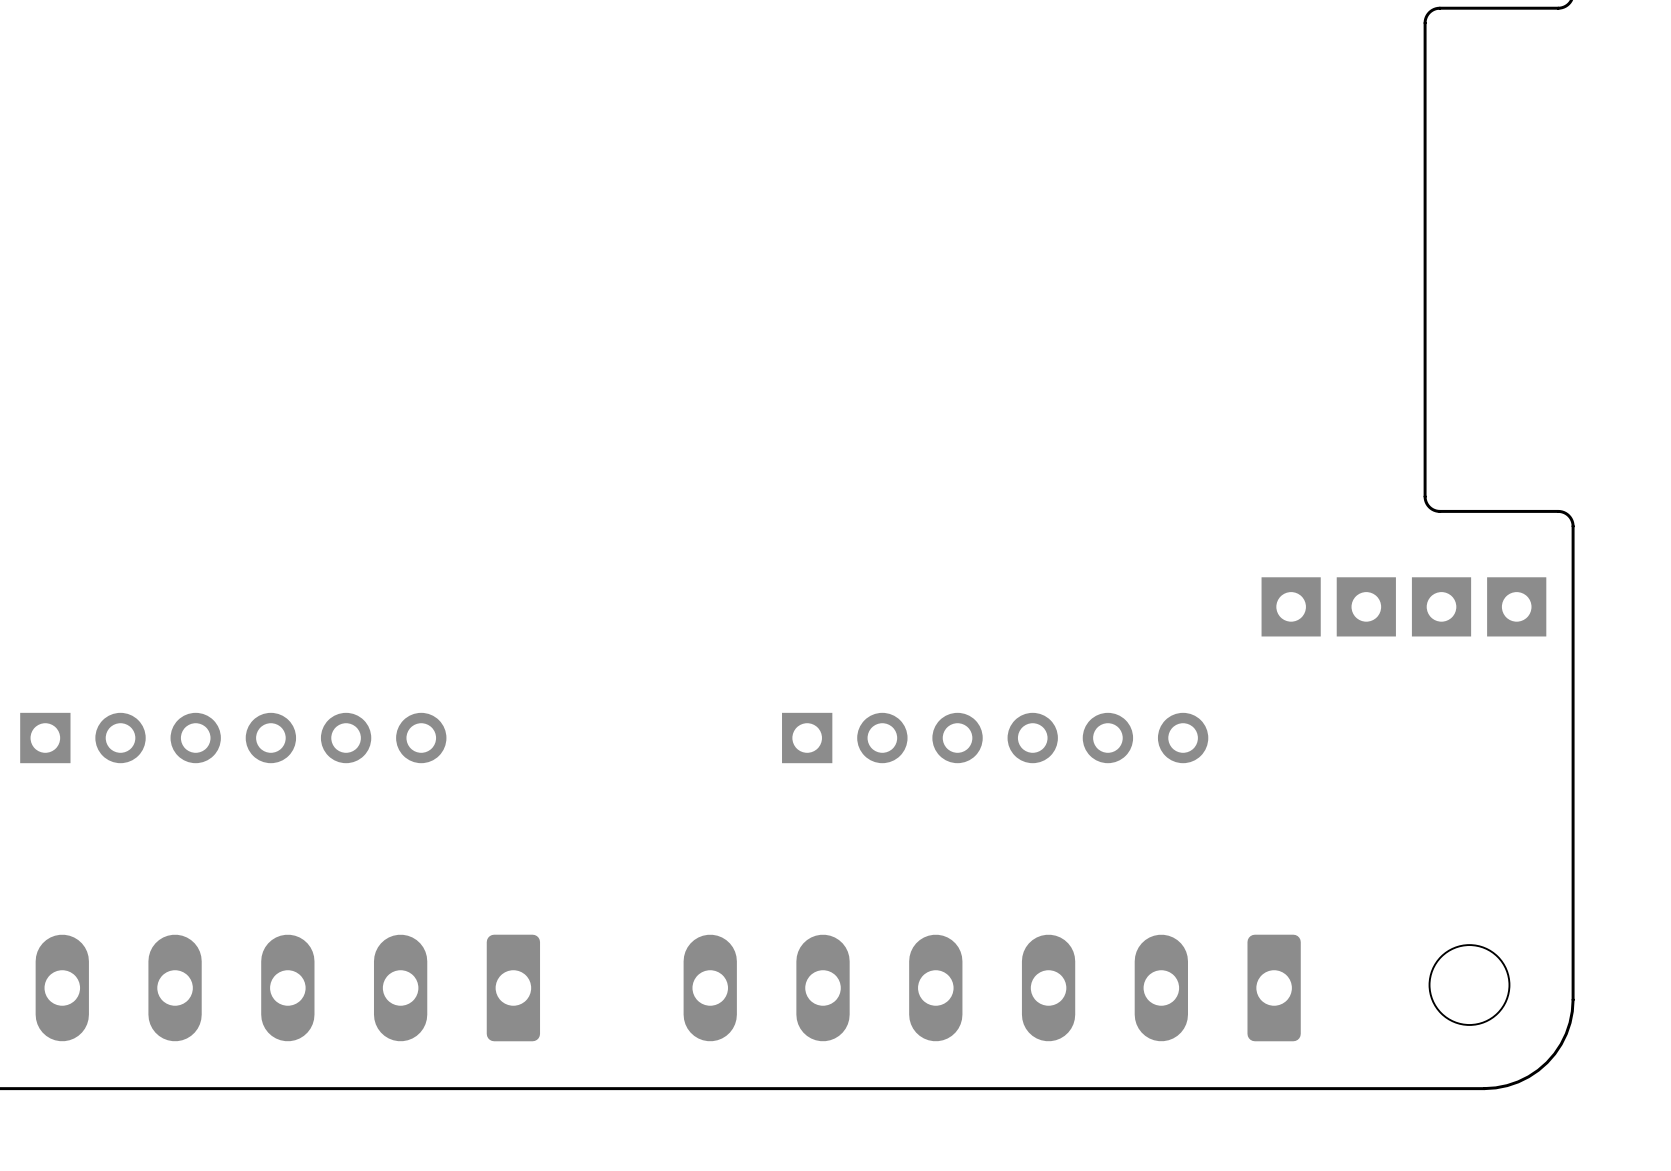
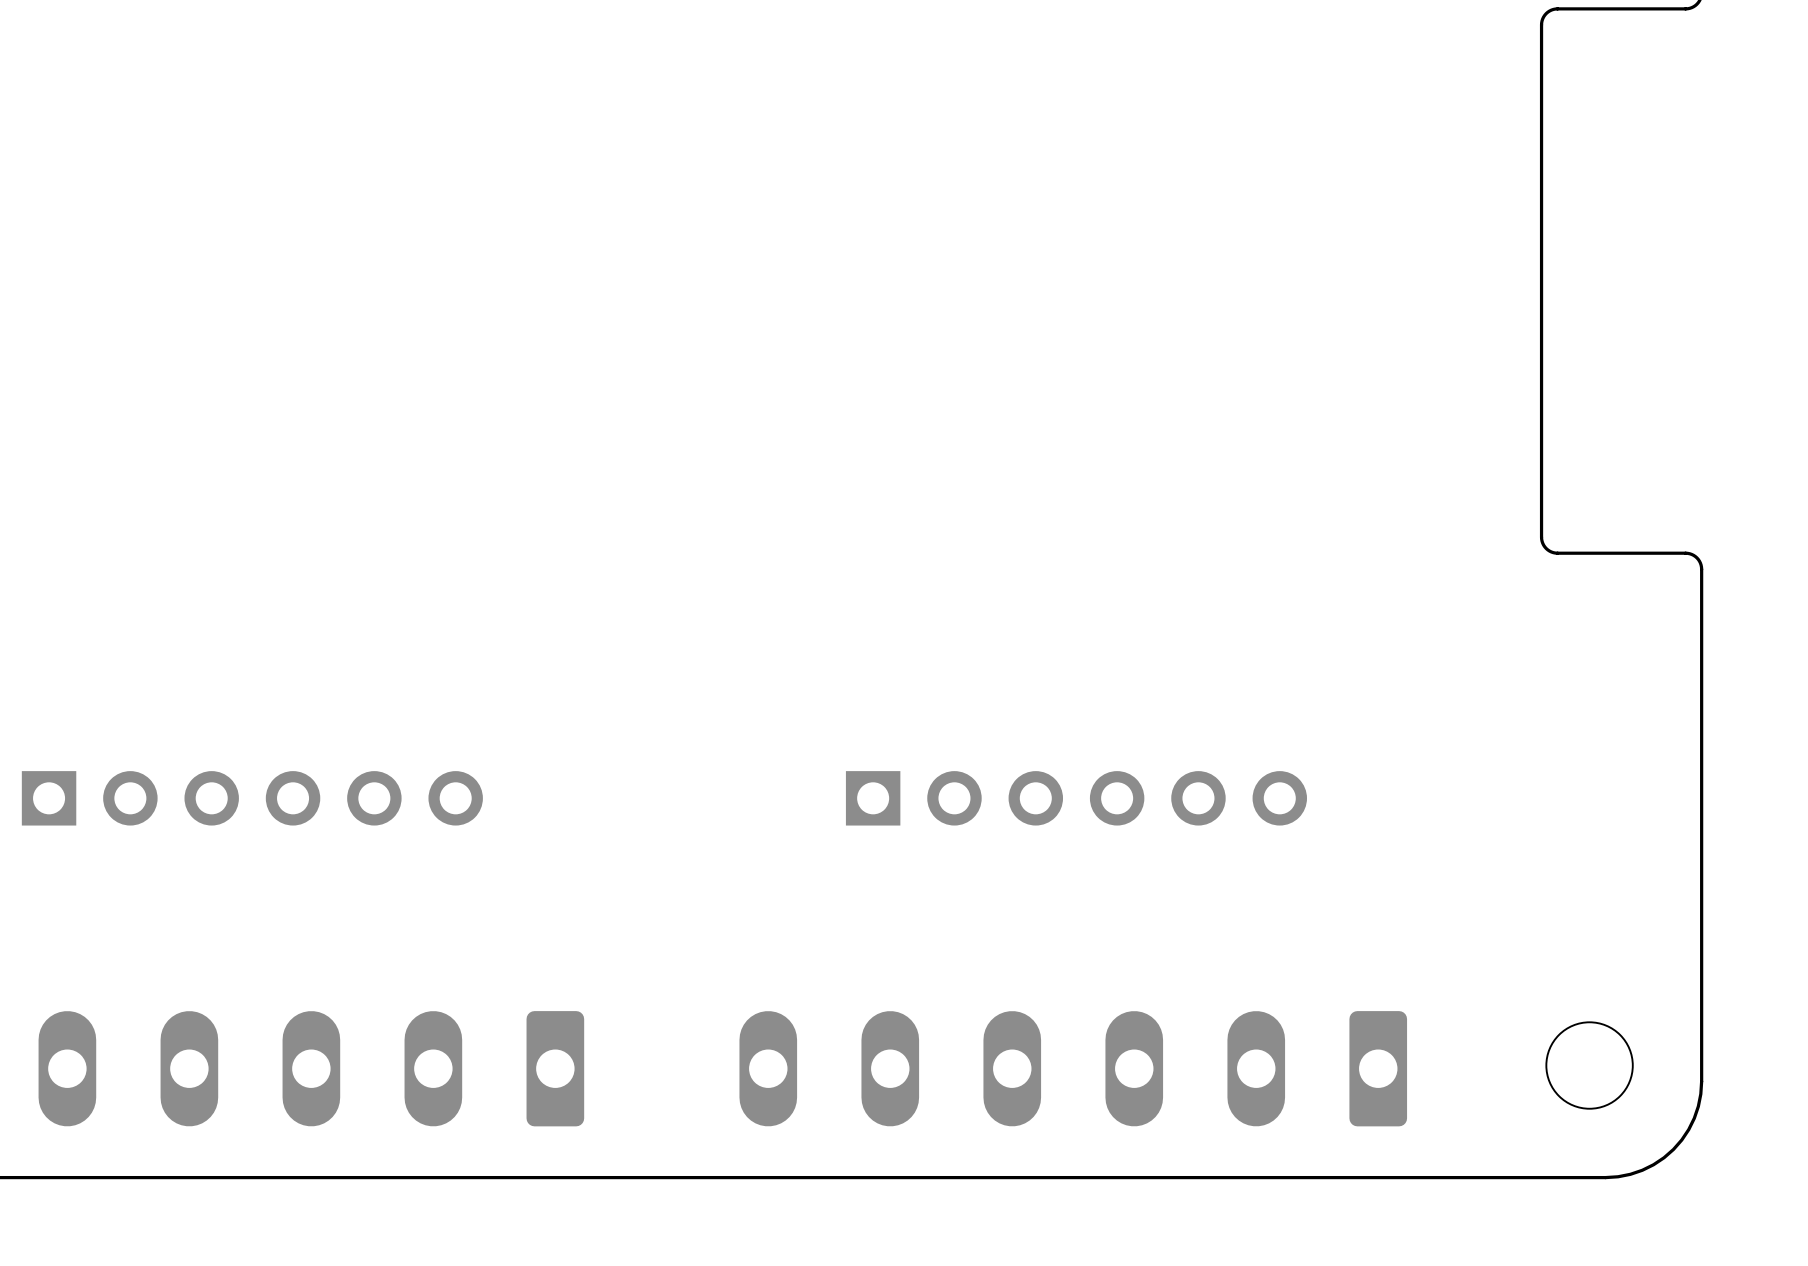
part: (1291, 606) -> none
part: (1366, 606) -> none
part: (1441, 606) -> none
part: (1516, 606) -> none

